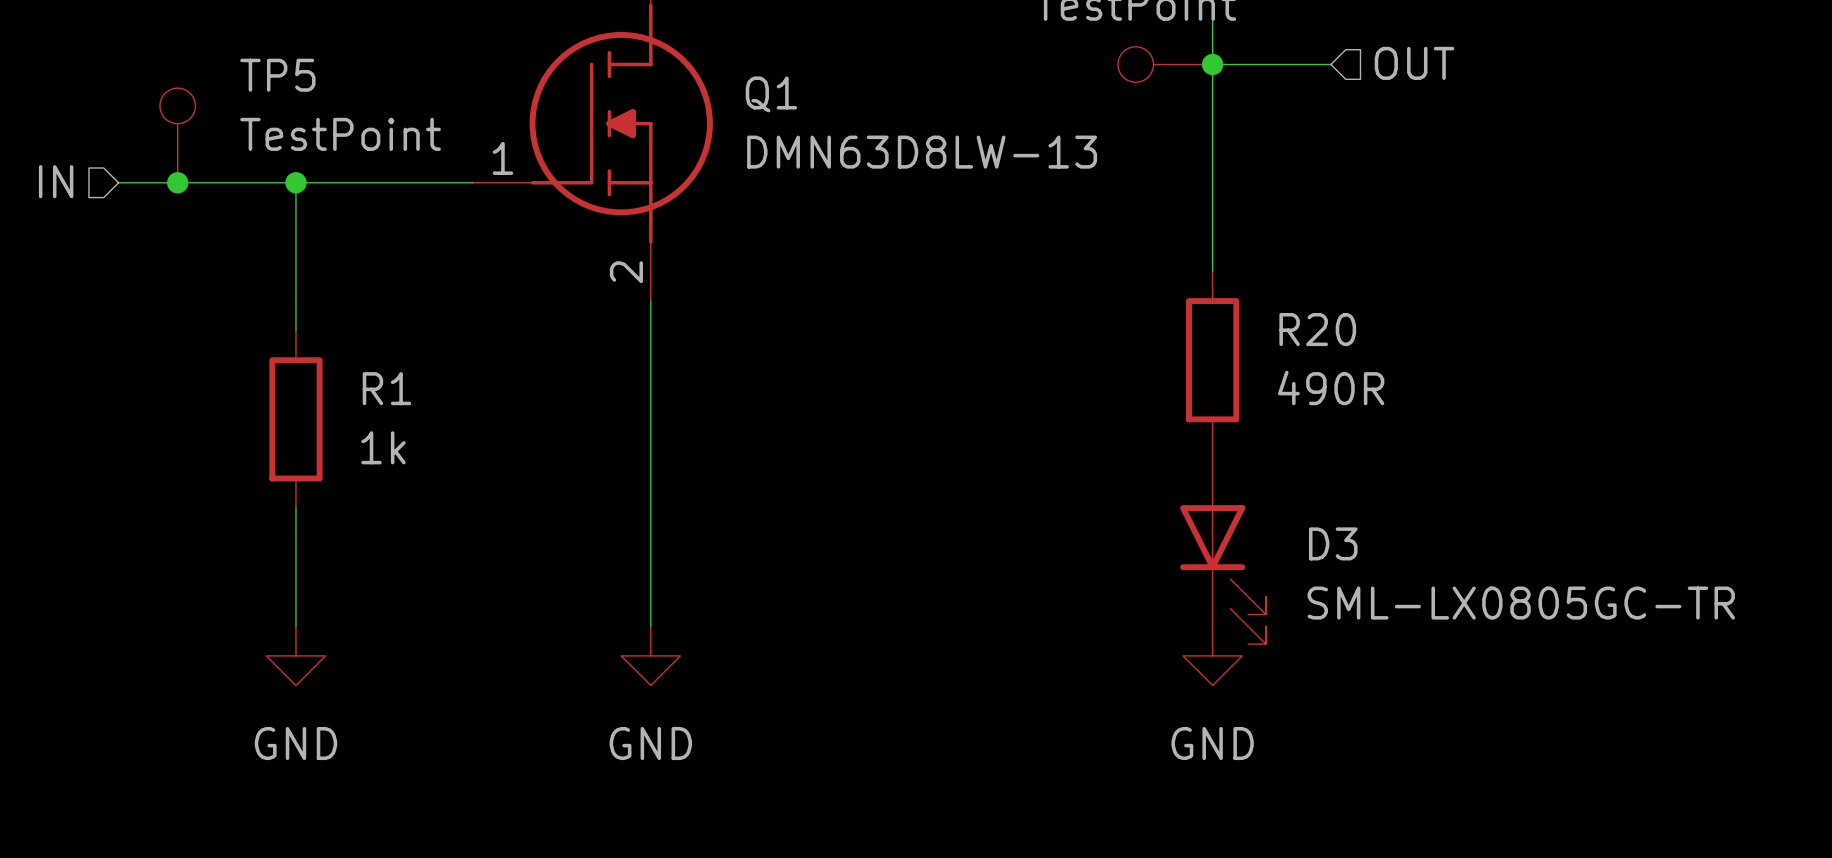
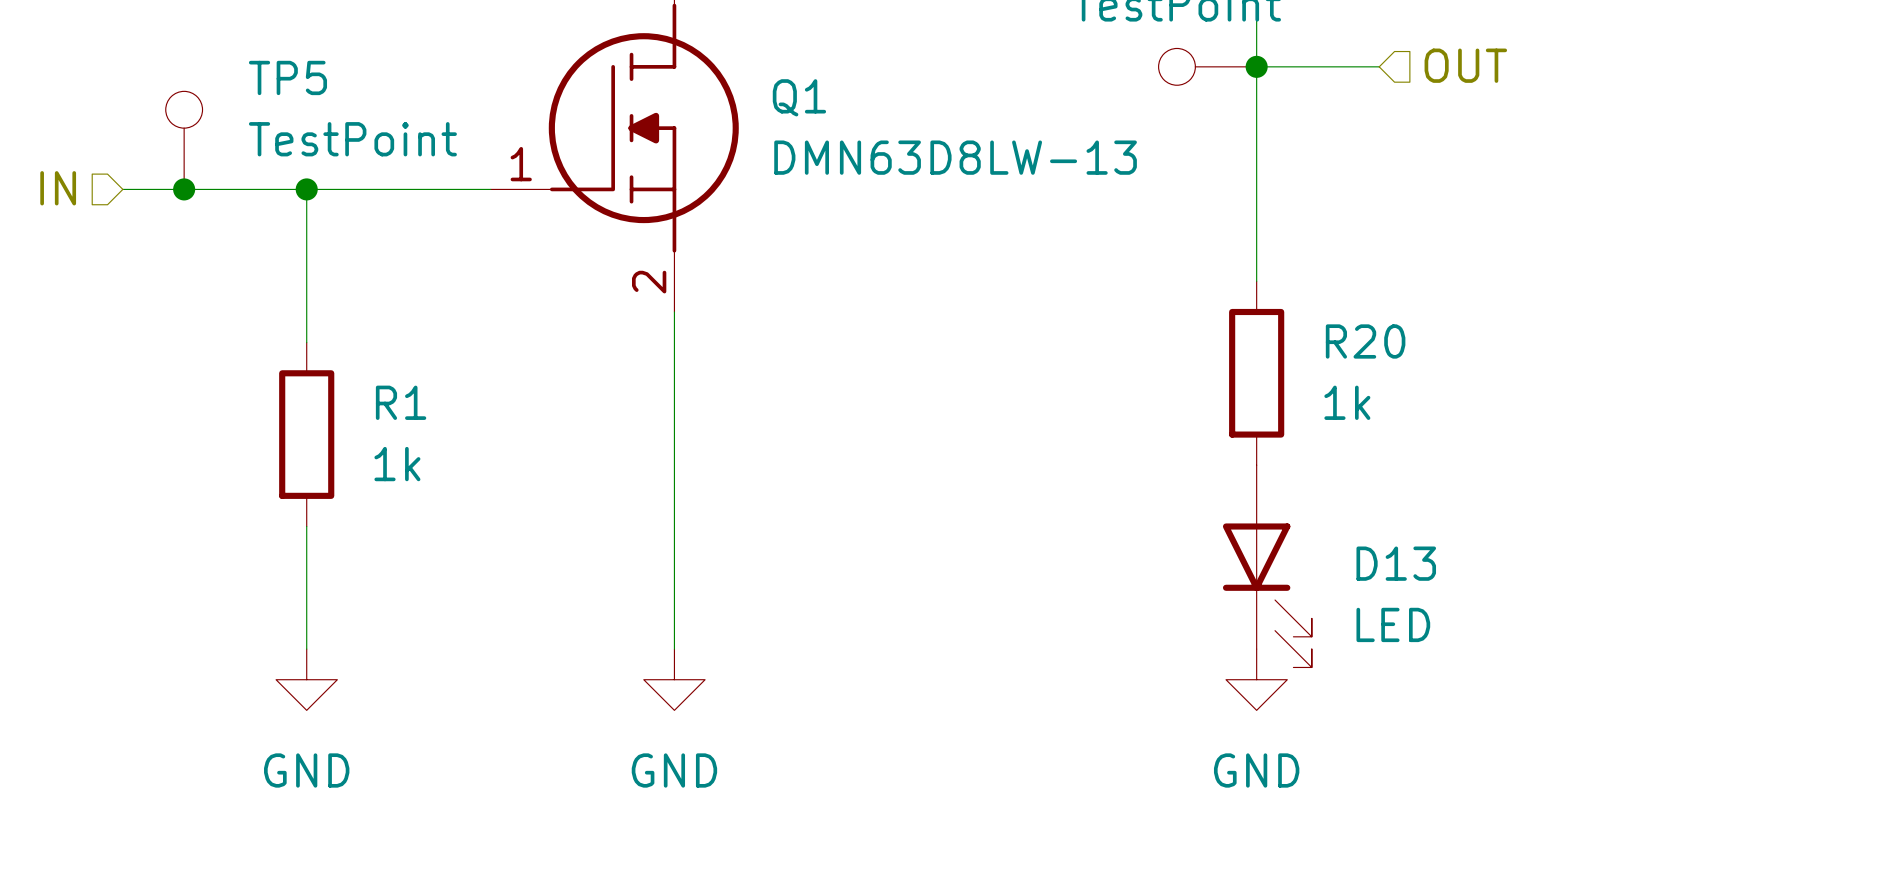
R20 value: 490R (1331, 387) -> 1k (1347, 402)
D3 name: D3 (1333, 543) -> D13 (1396, 563)
D3 value: SML-LX0805GC-TR (1521, 603) -> LED (1393, 624)

